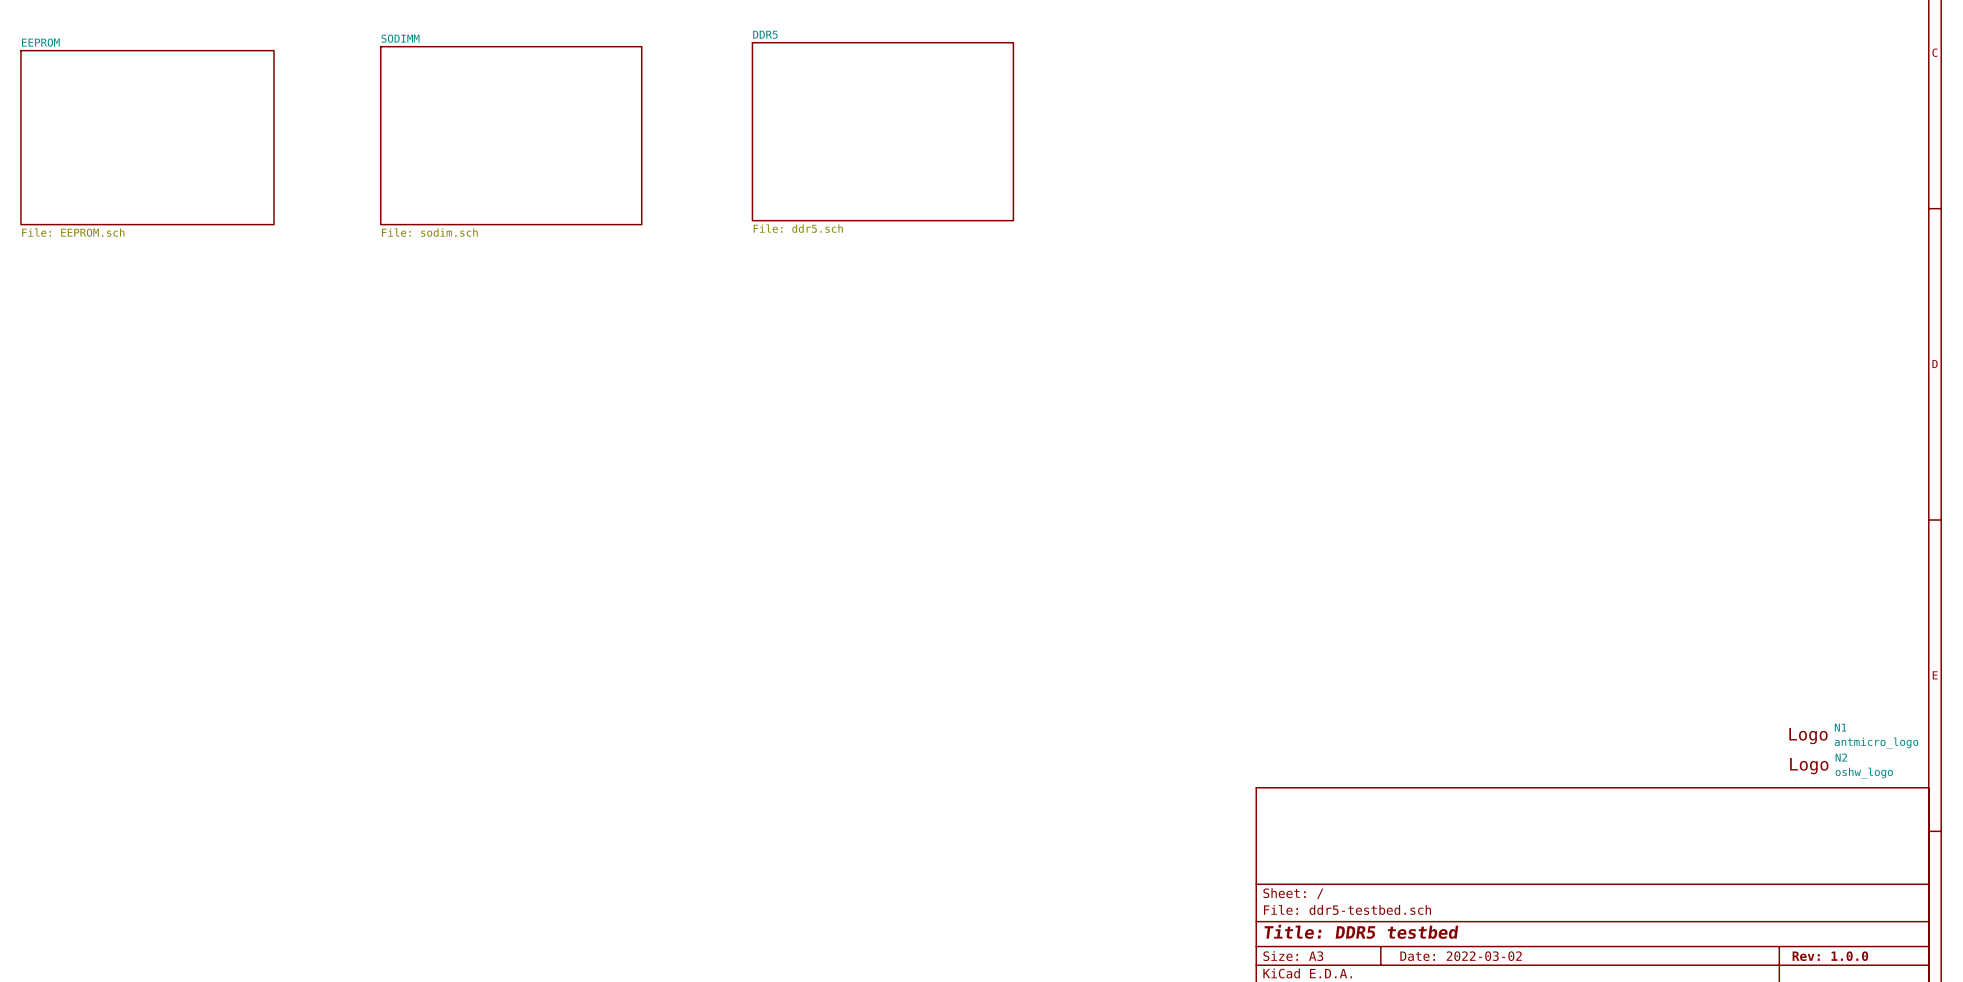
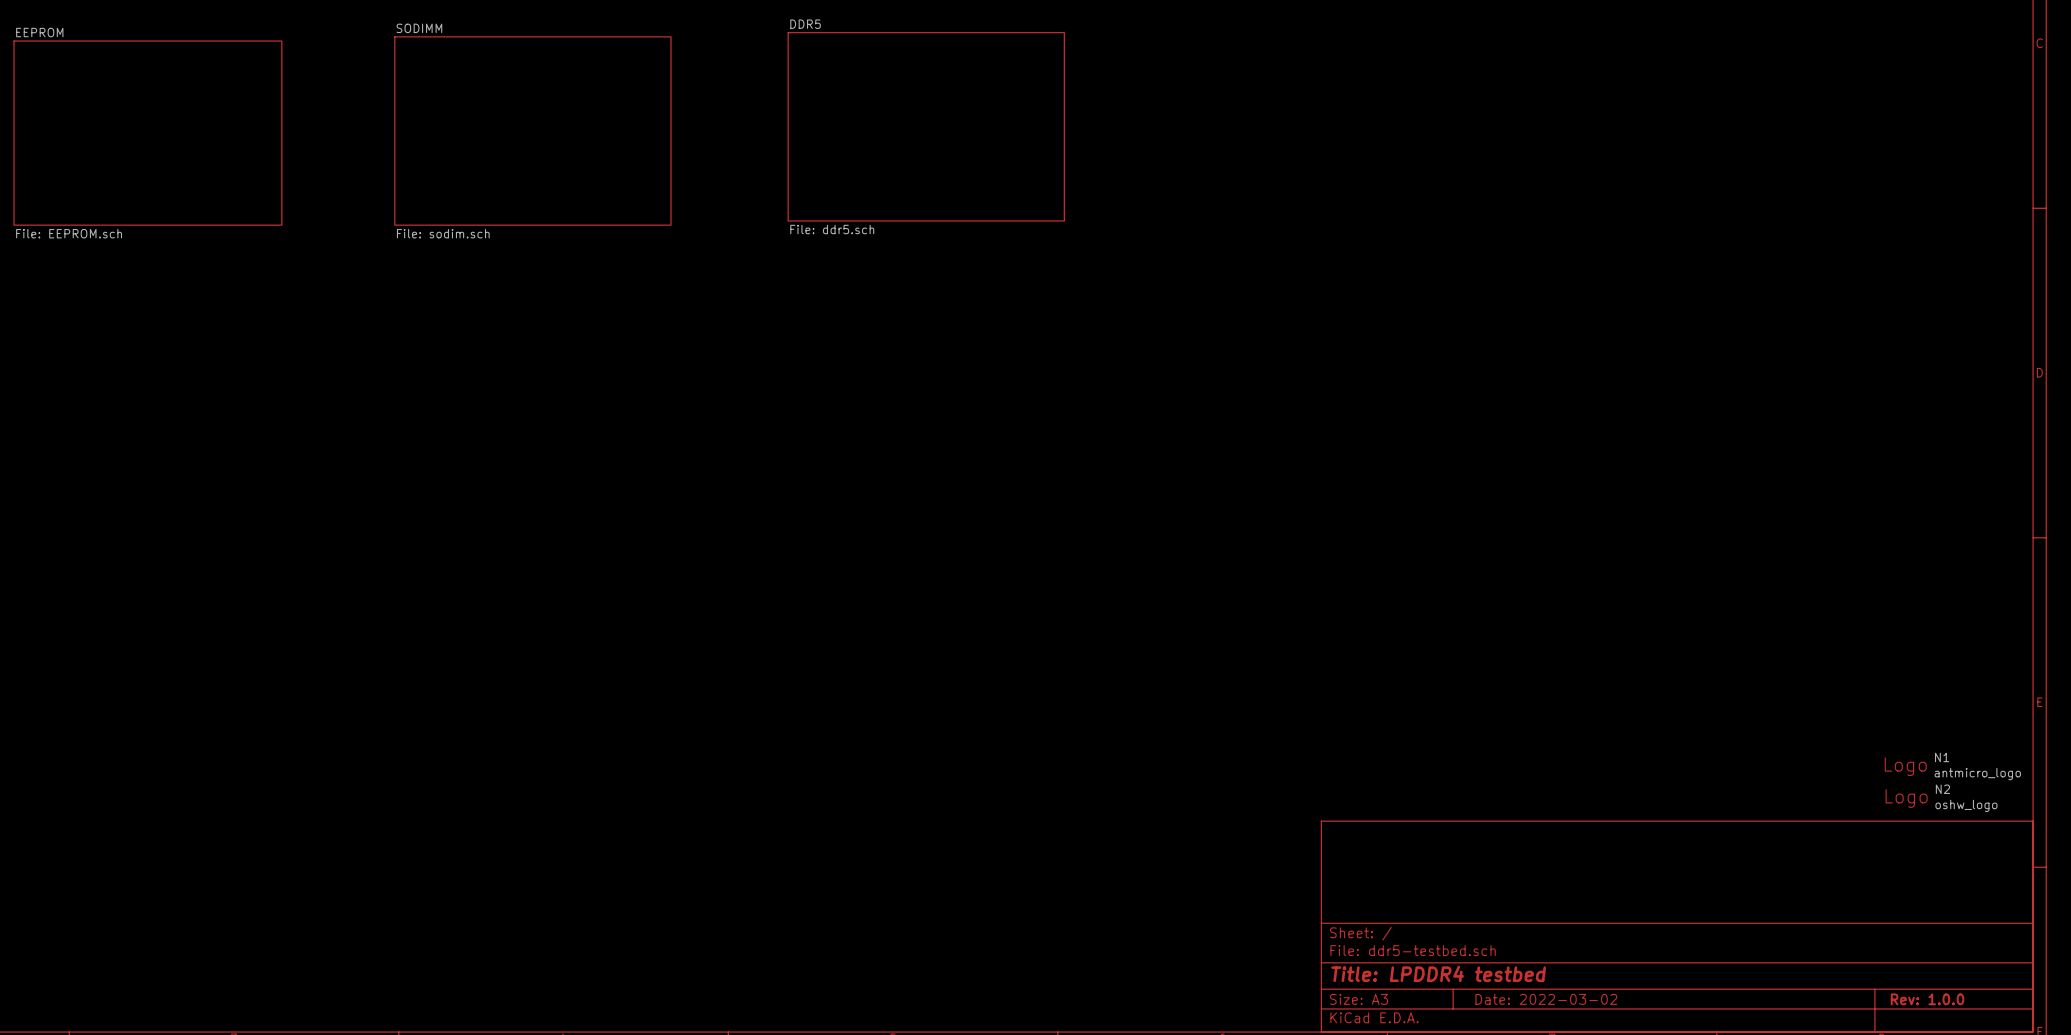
title block: Title: DDR5 testbed (1361, 931) -> Title: LPDDR4 testbed (1438, 973)

